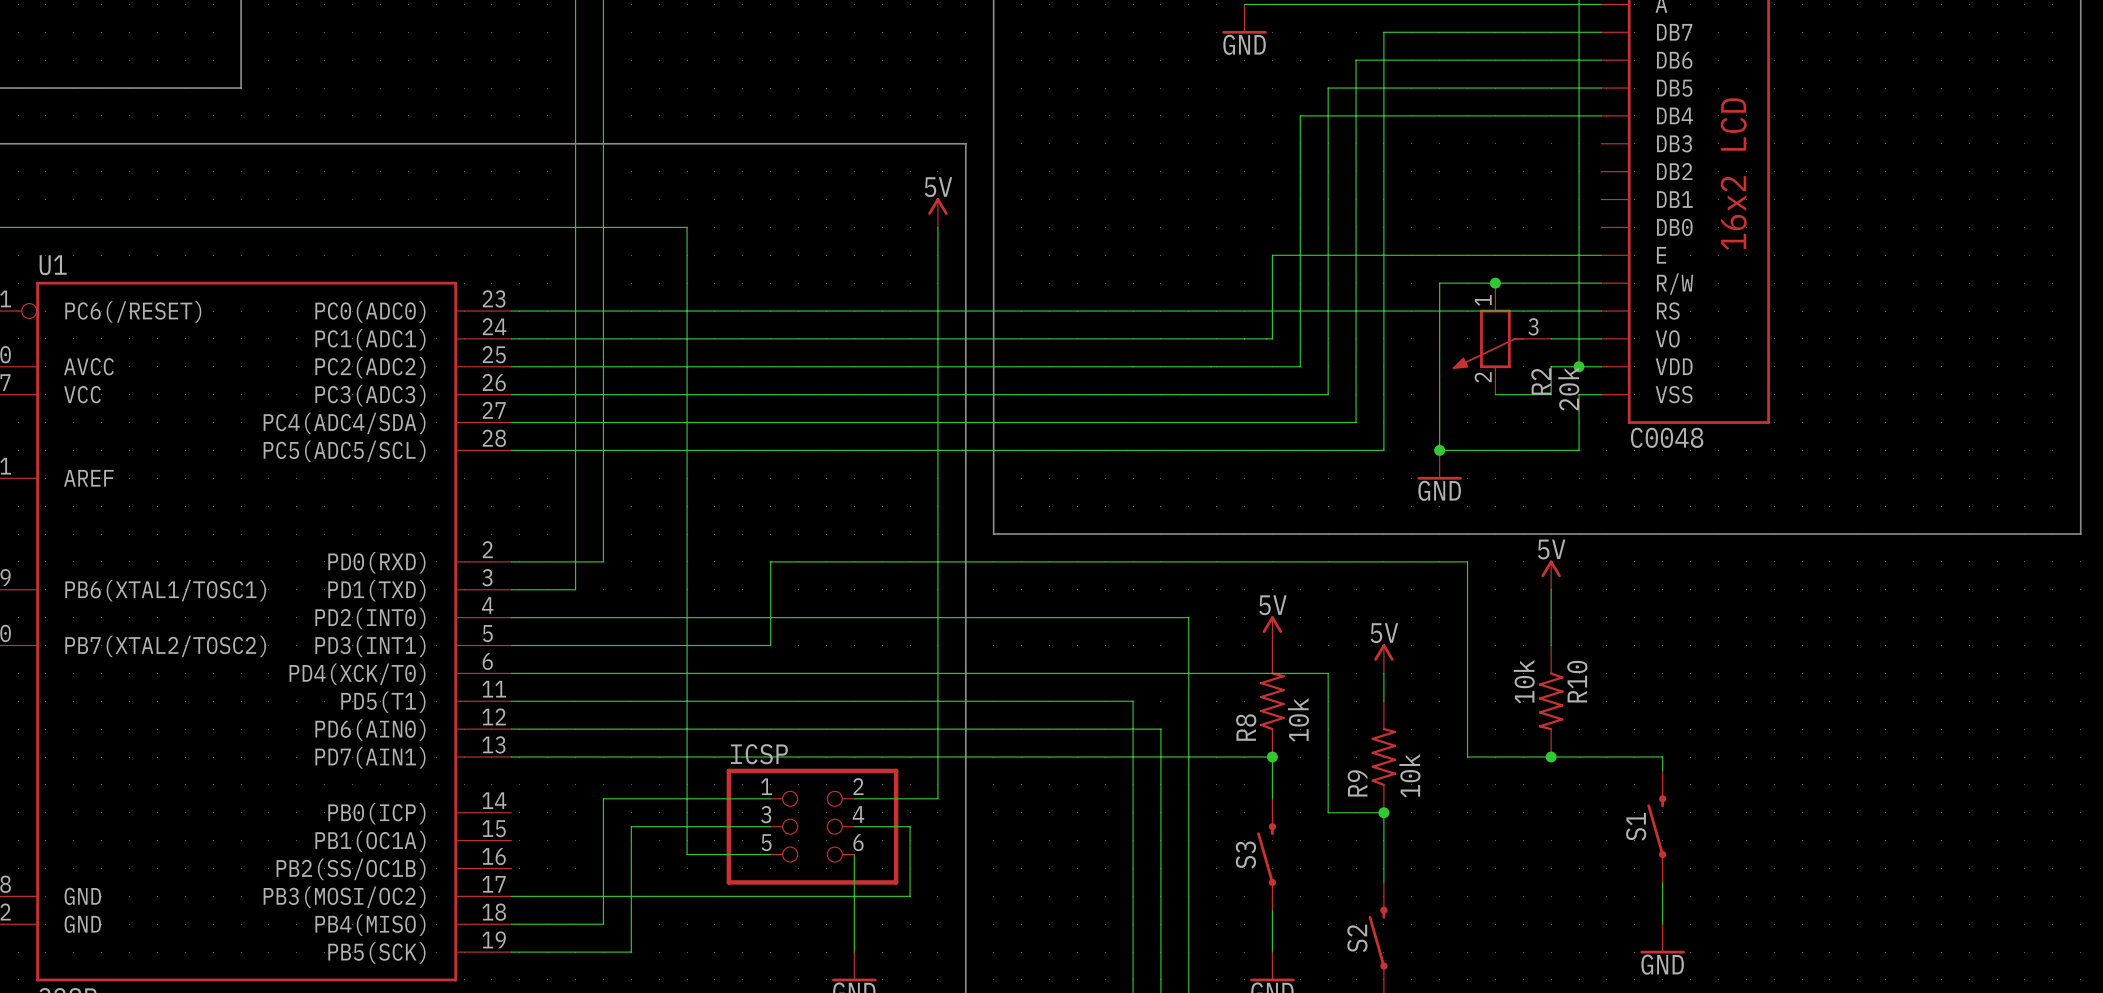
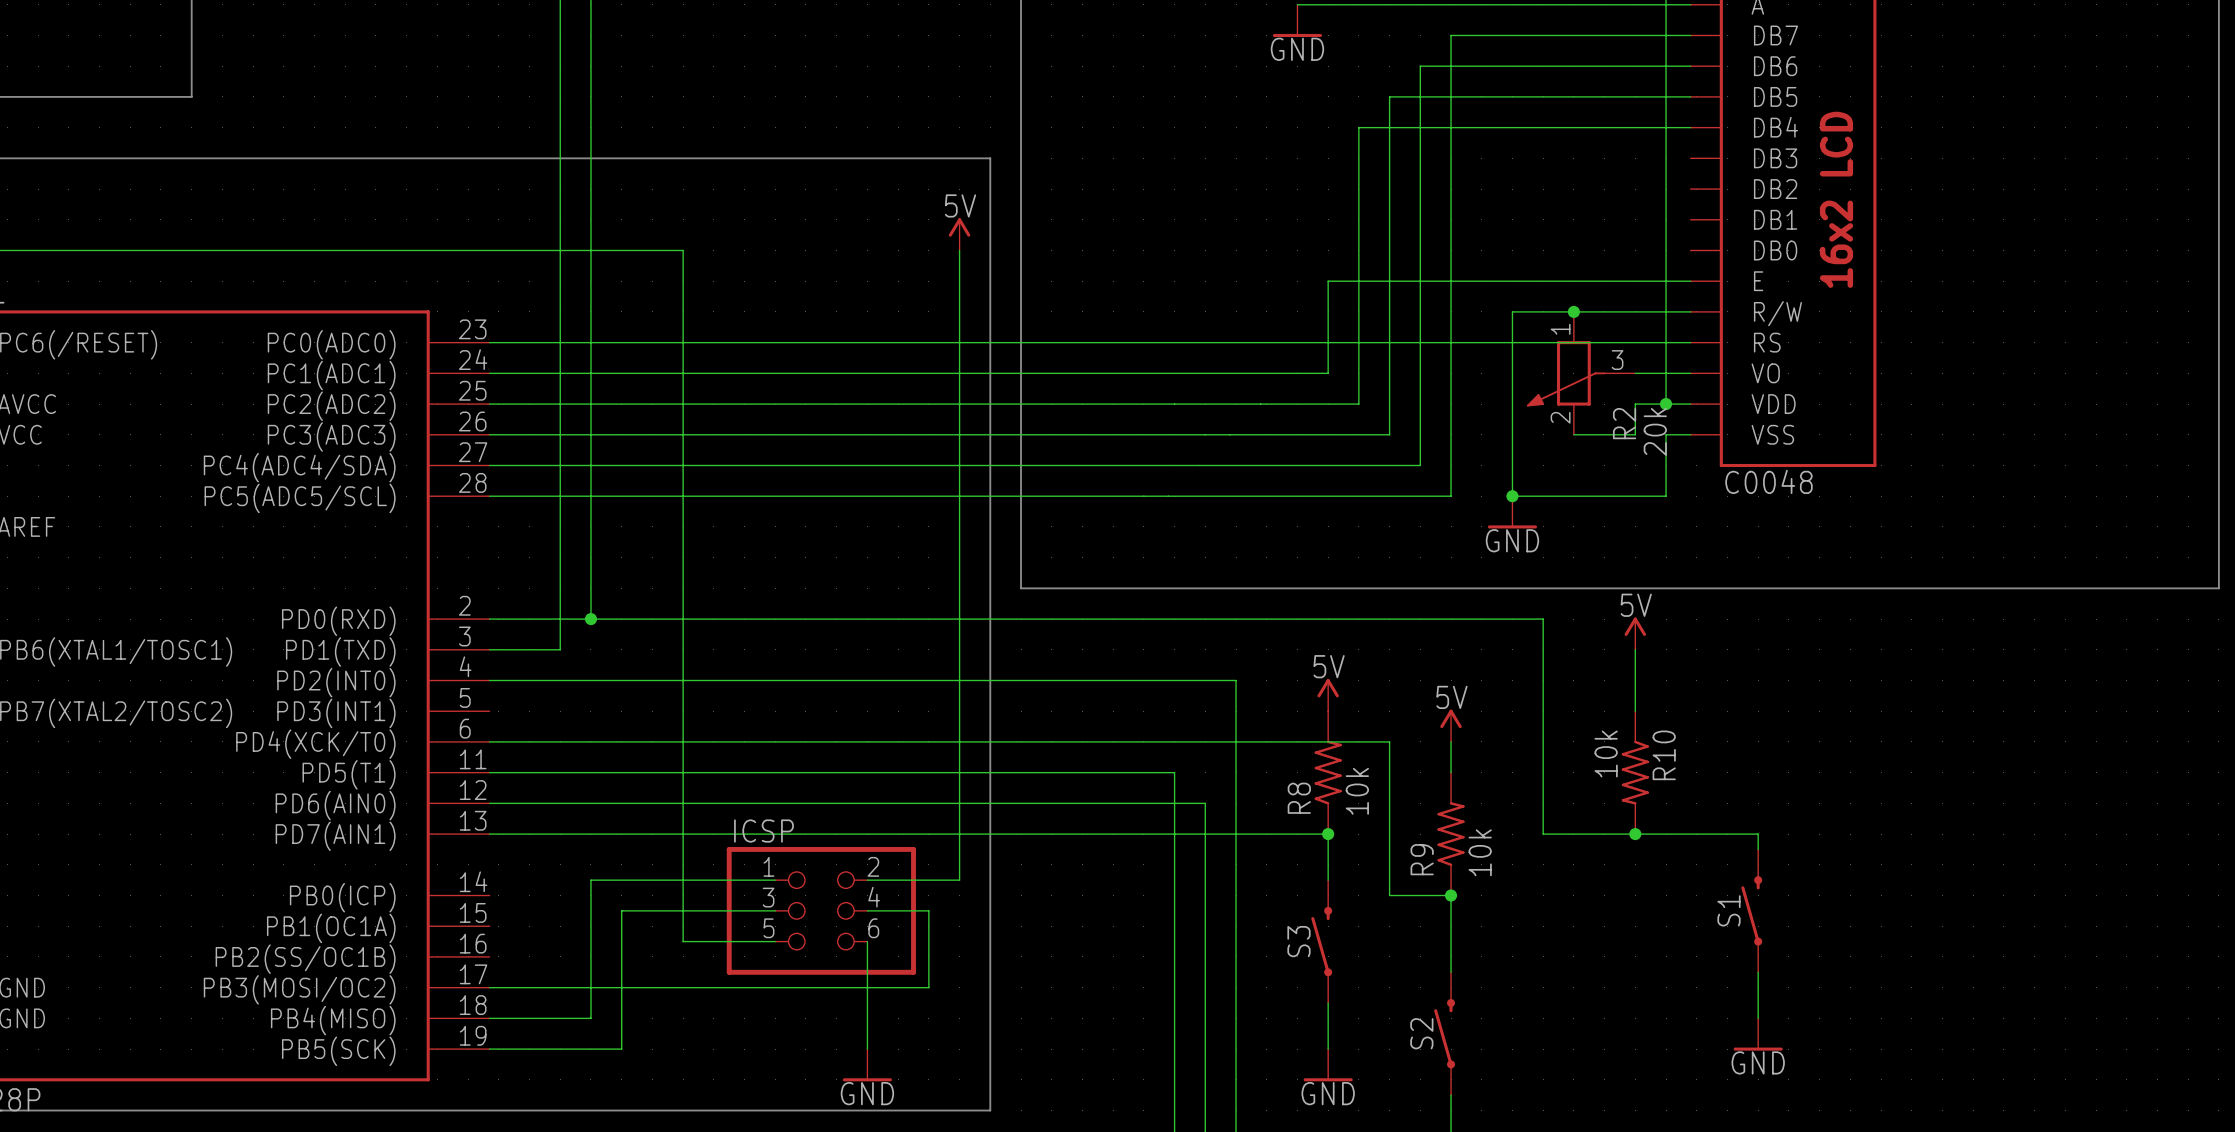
junction: none -> (590, 619)
wire: (770, 561) (770, 645) (511, 645) -> (775, 619) (590, 619)

